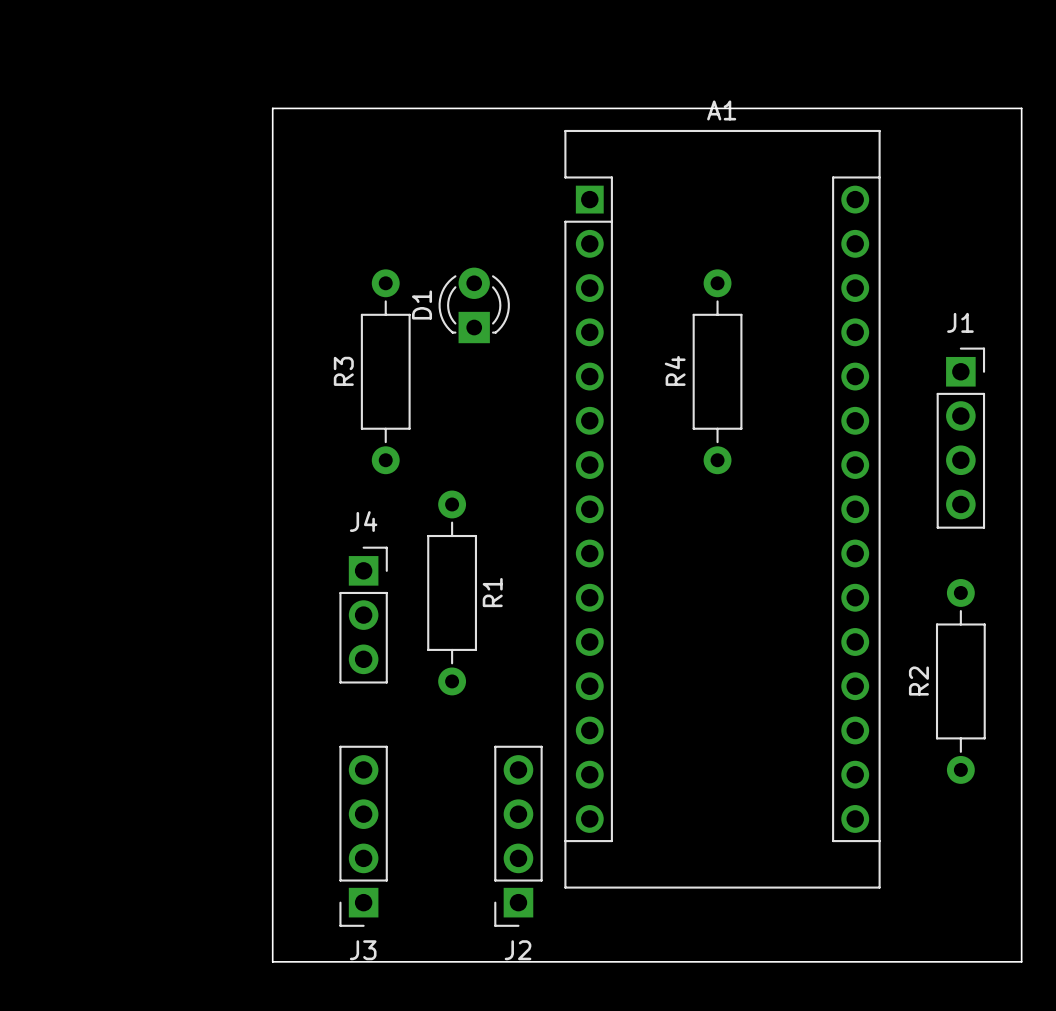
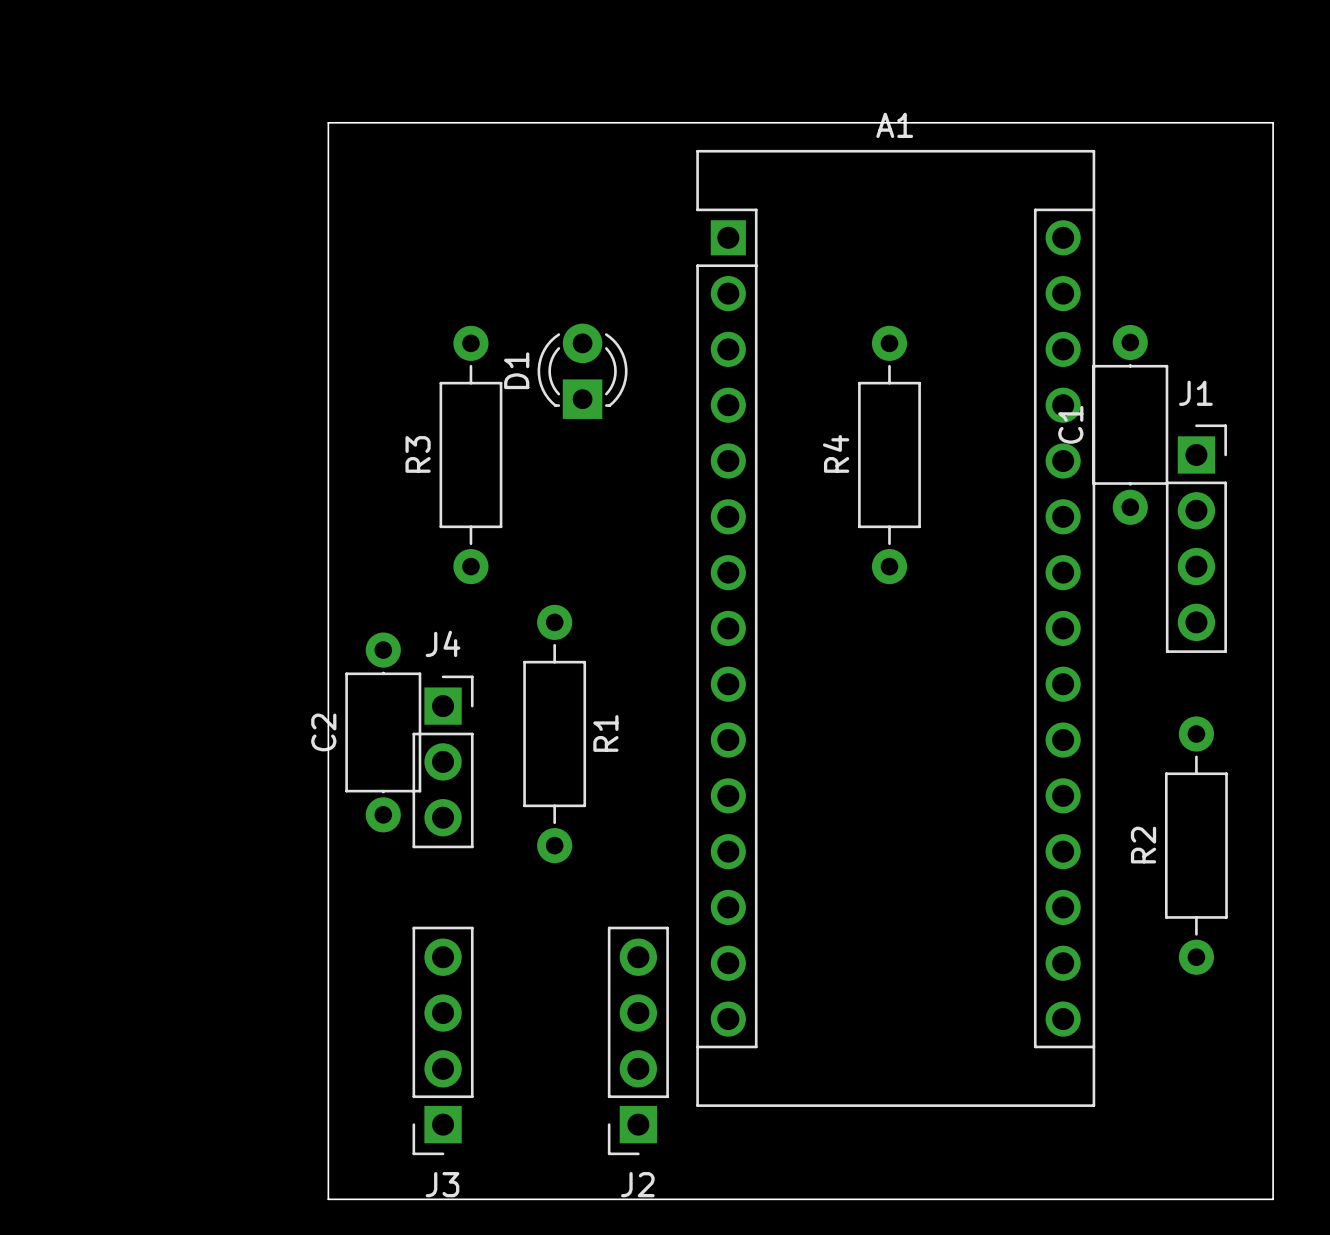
C1: none -> (1130, 424)
C2: none -> (383, 732)

